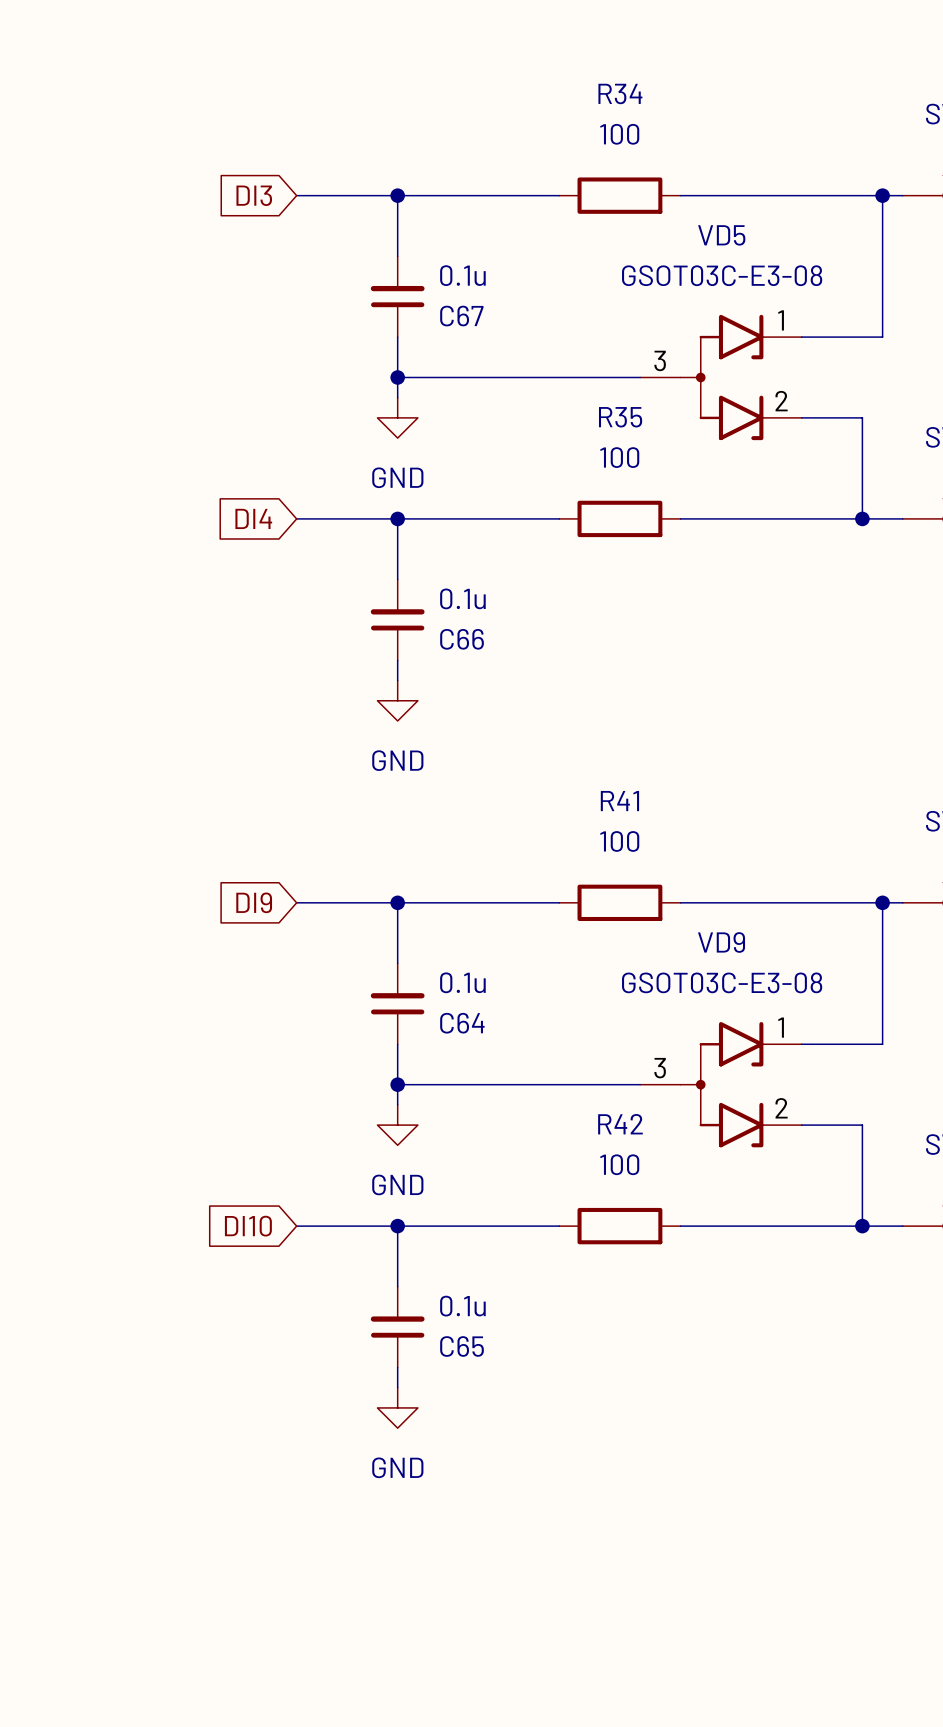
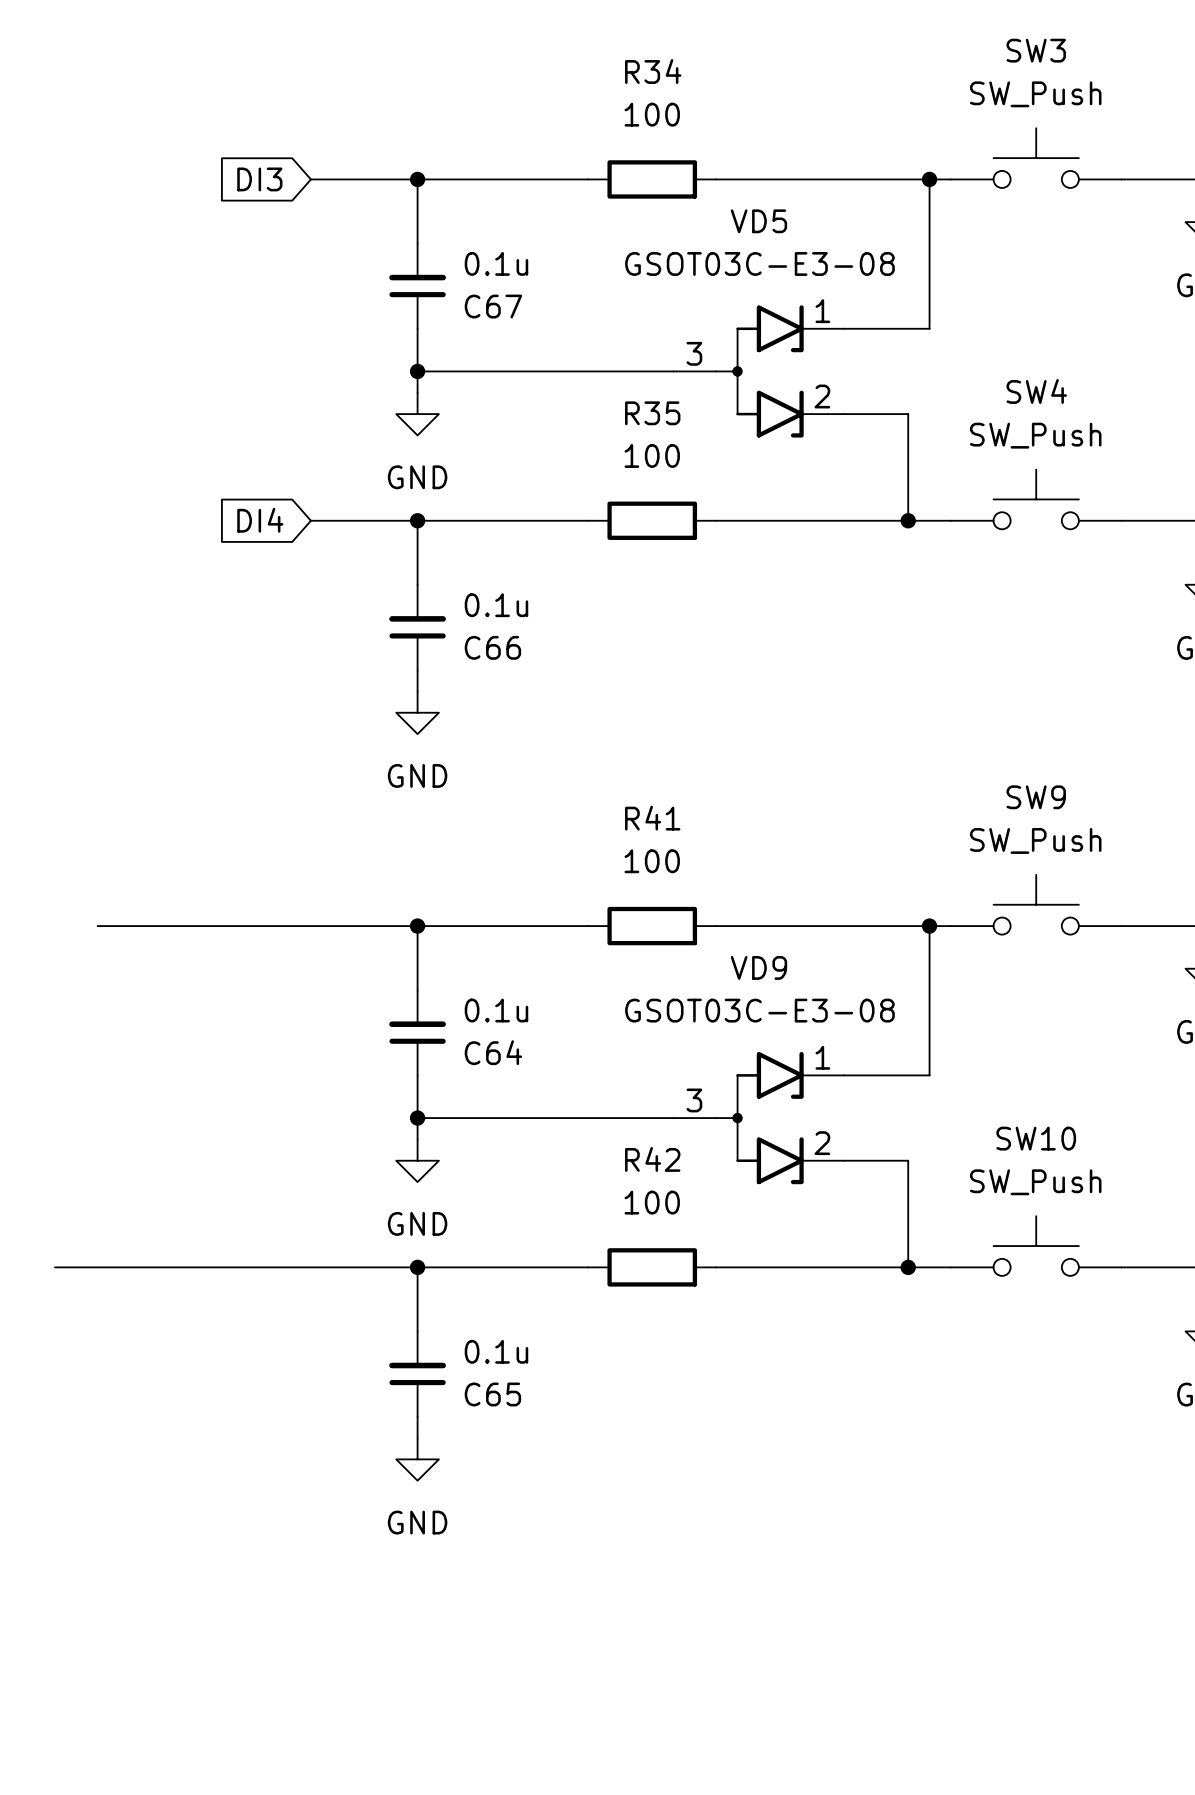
wire: none -> (97, 926) (310, 926)
global label: DI9 (254, 902) -> none
wire: none -> (54, 1267) (310, 1267)
global label: DI10 (248, 1226) -> none

